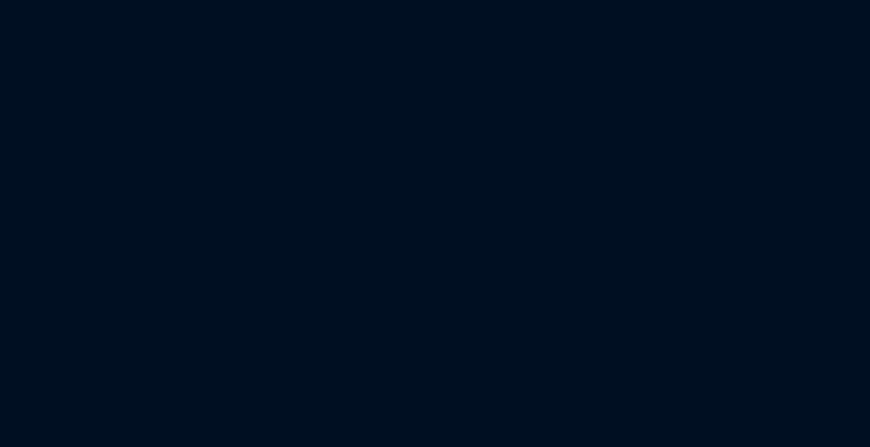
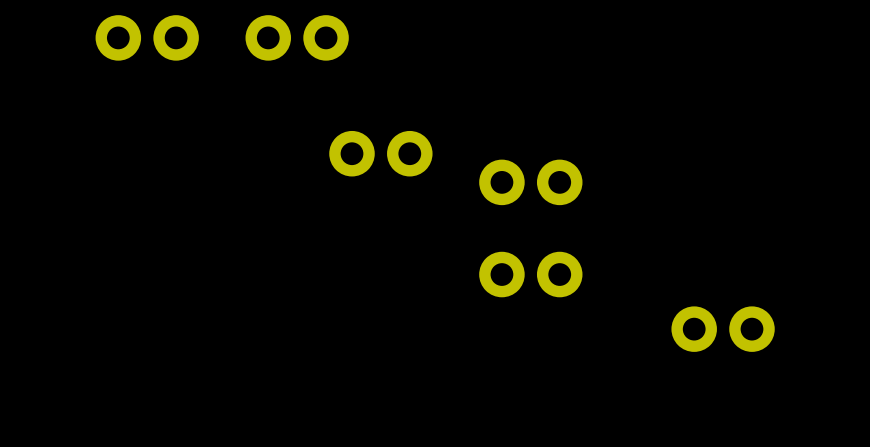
part: none -> (147, 37)
part: none -> (297, 37)
part: none -> (380, 153)
part: none -> (530, 182)
part: none -> (530, 274)
part: none -> (723, 329)

